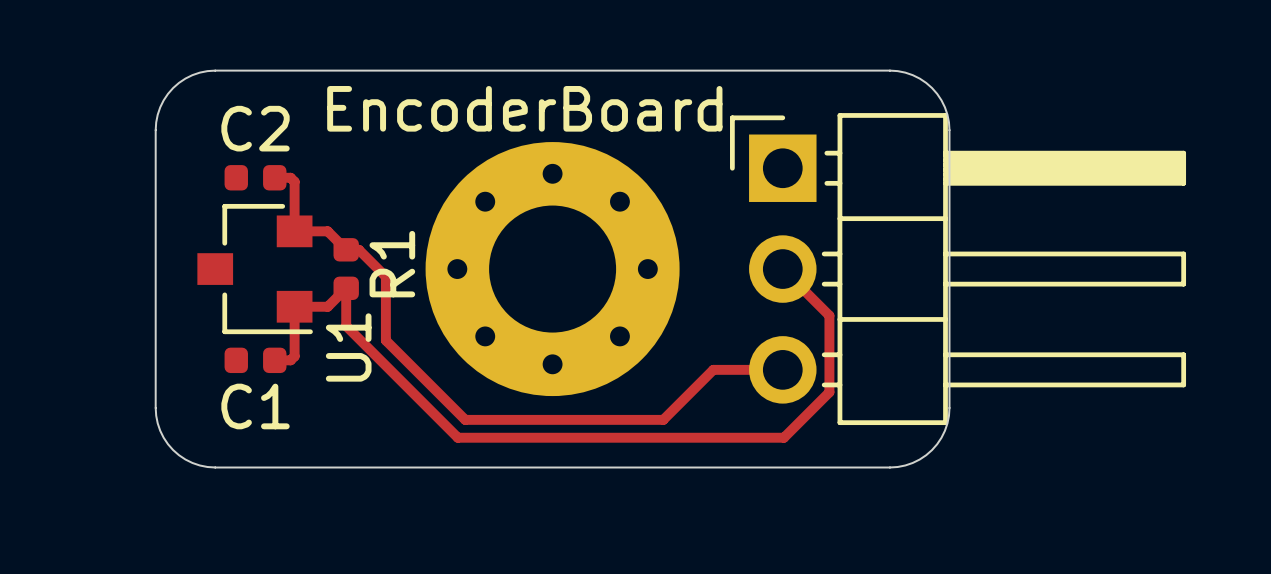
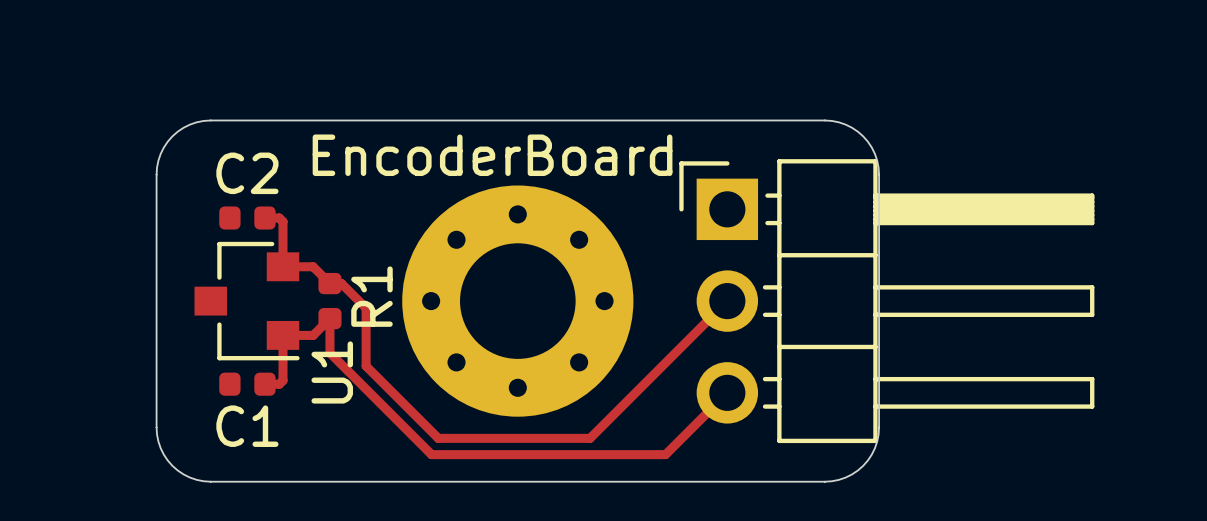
track: (782, 269) (829, 315) (829, 392) (783, 437) (714, 437) -> (727, 301) (590, 438)
track: (782, 369) (713, 369) (663, 419) (631, 419) -> (727, 392) (665, 454)

